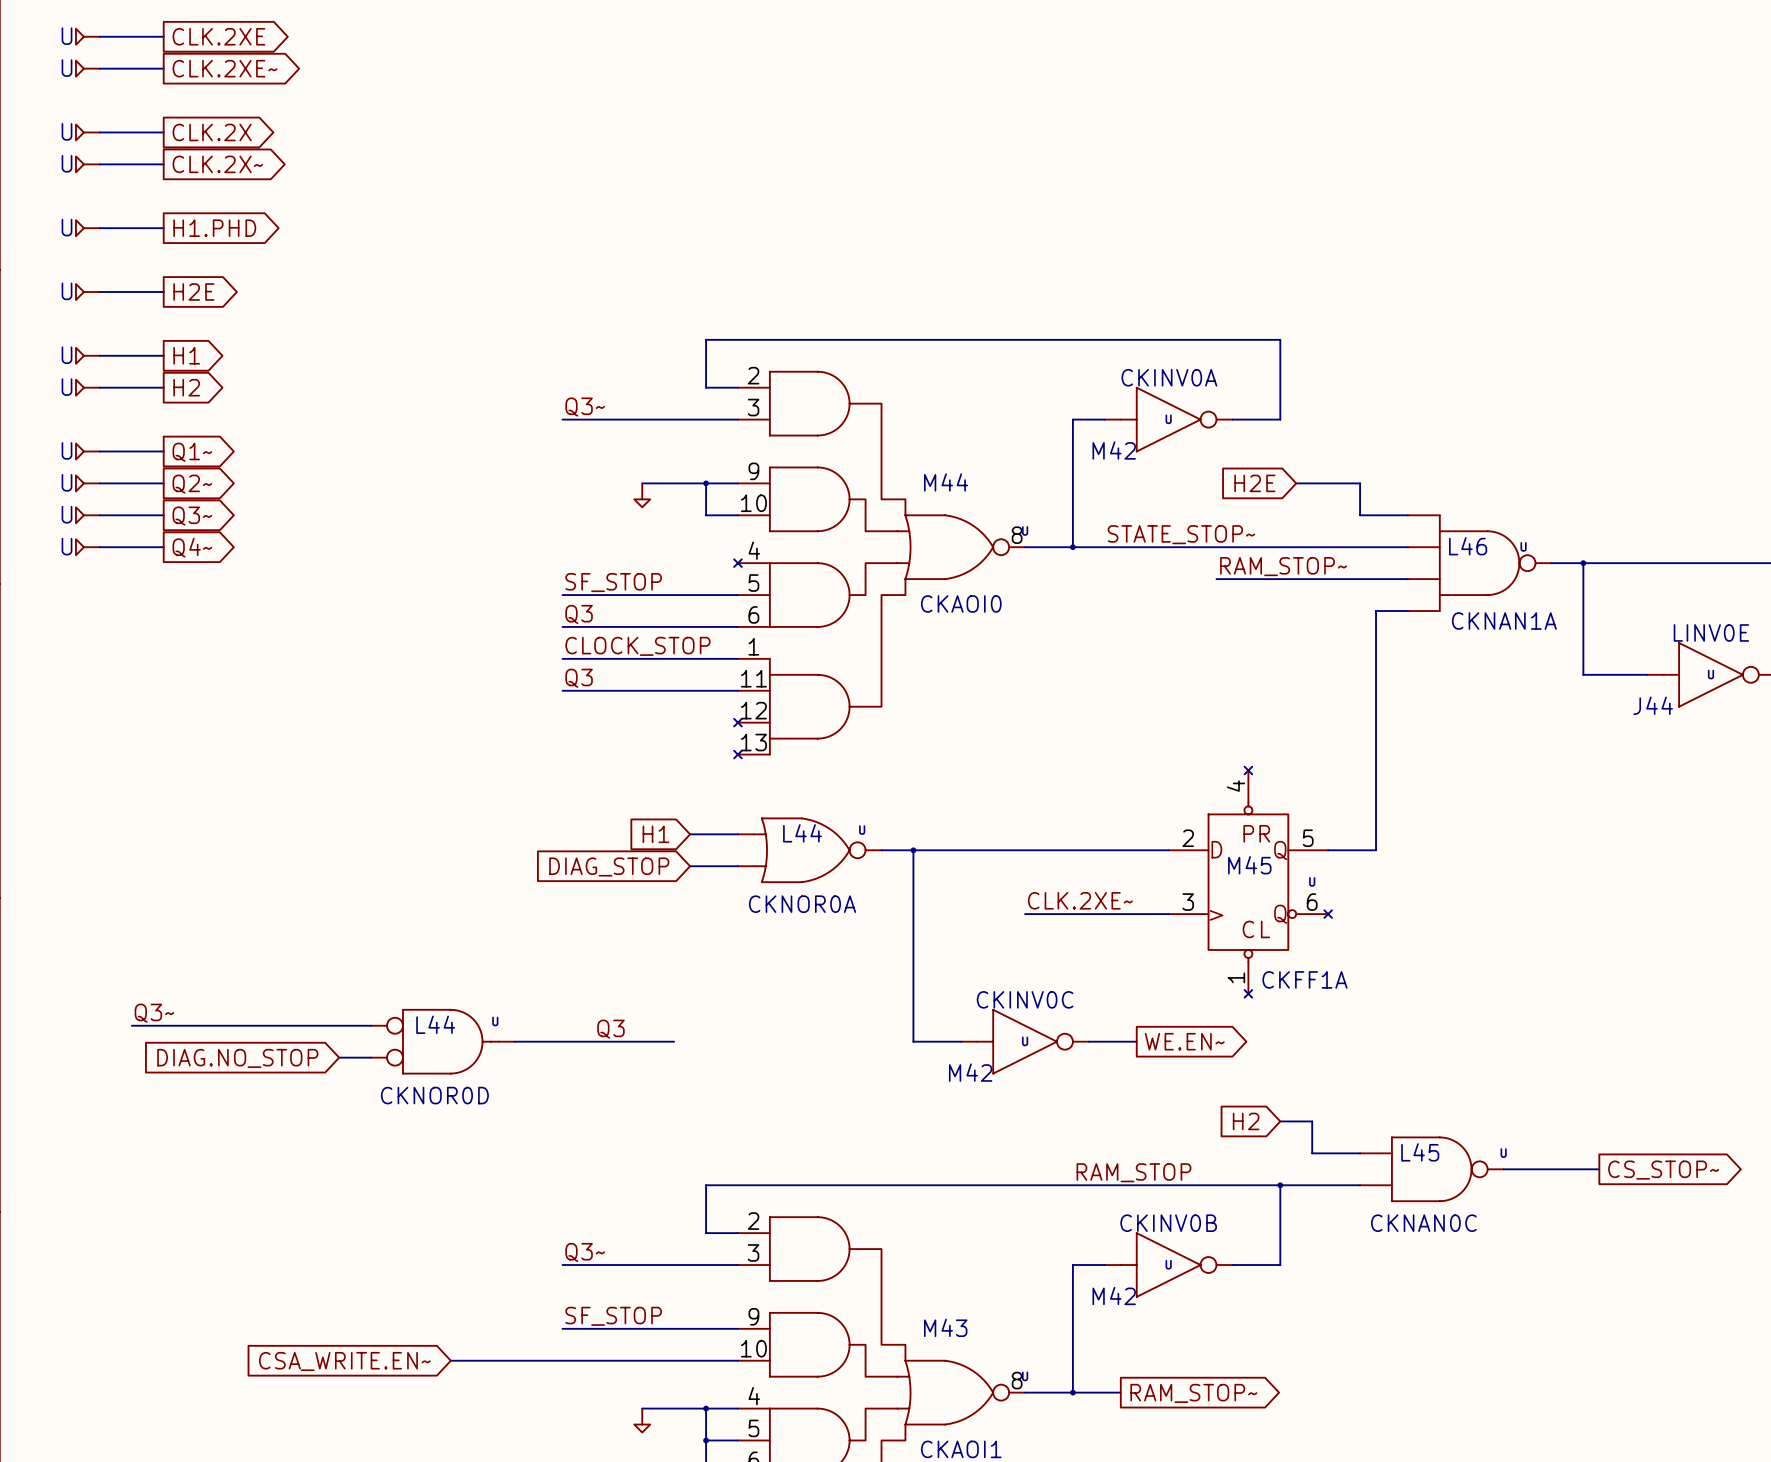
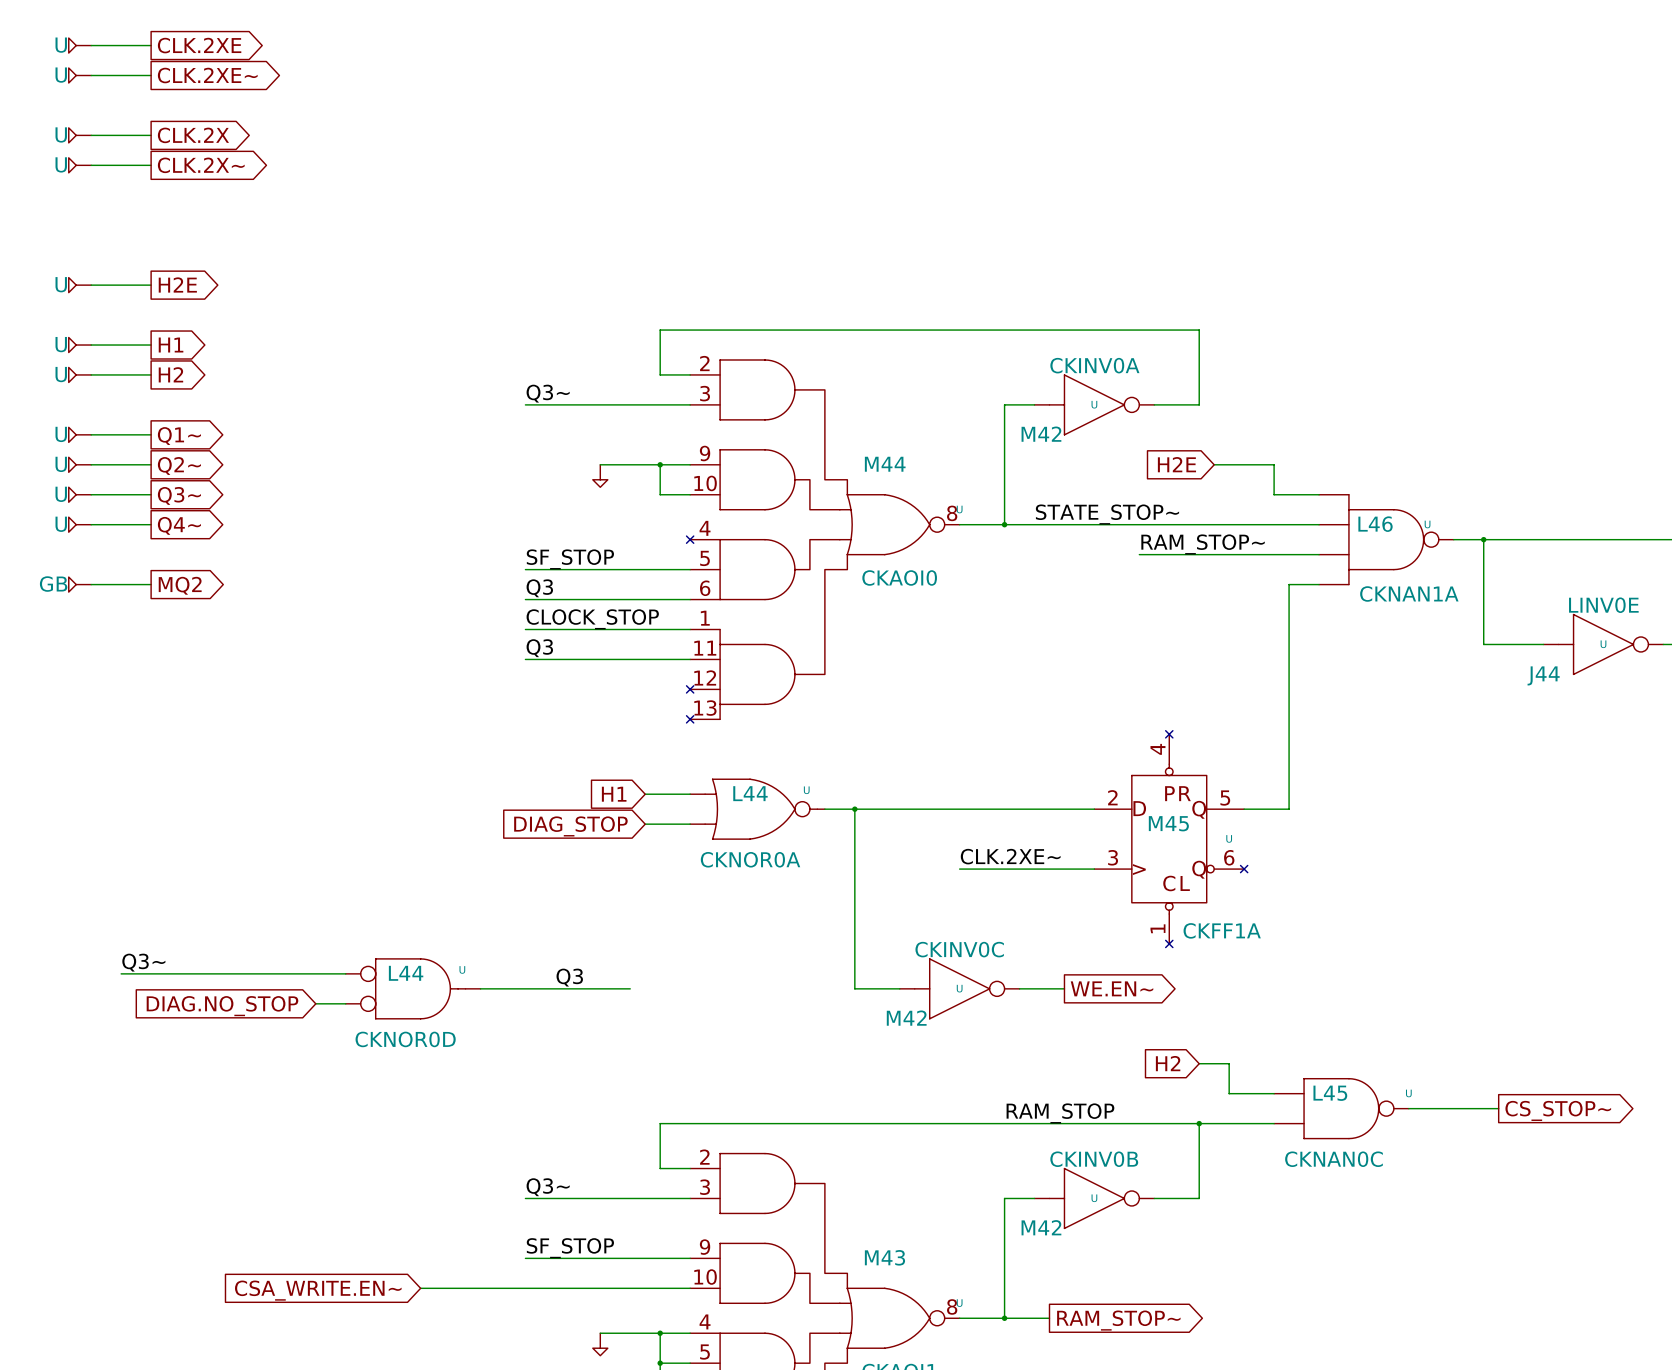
U: (87, 228) -> none
wire: (99, 228) (163, 228) -> none
global label: H1.PHD (214, 228) -> none
GB: none -> (79, 584)
wire: none -> (91, 584) (151, 584)
global label: none -> MQ2 (180, 585)

